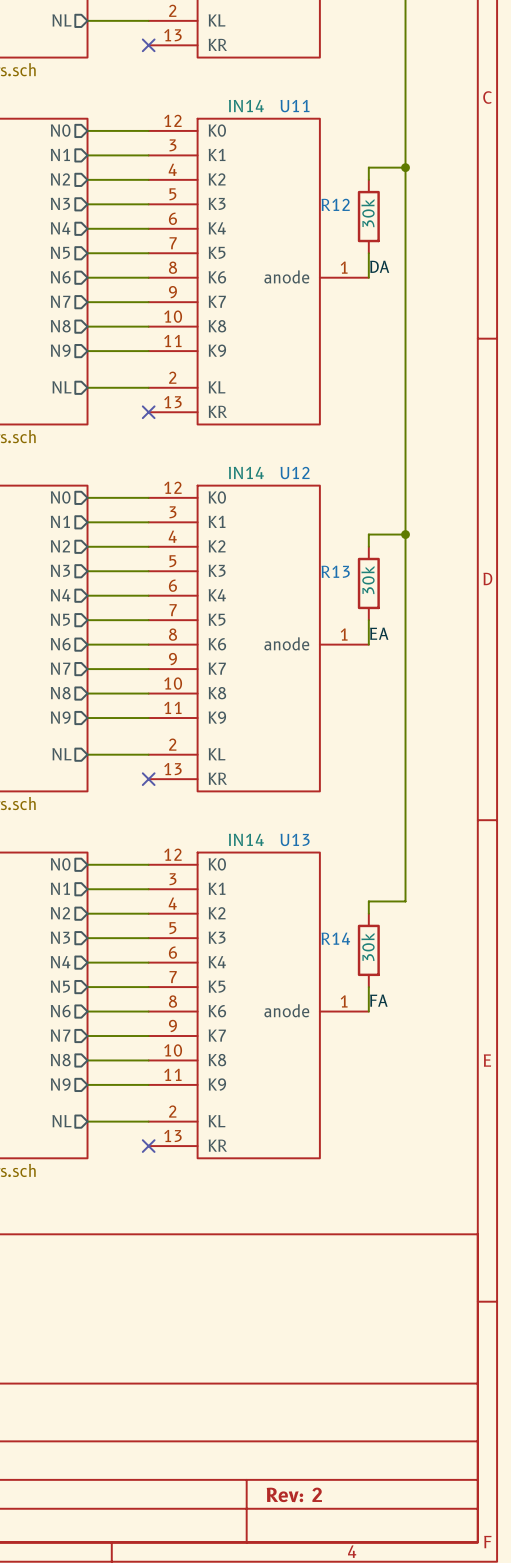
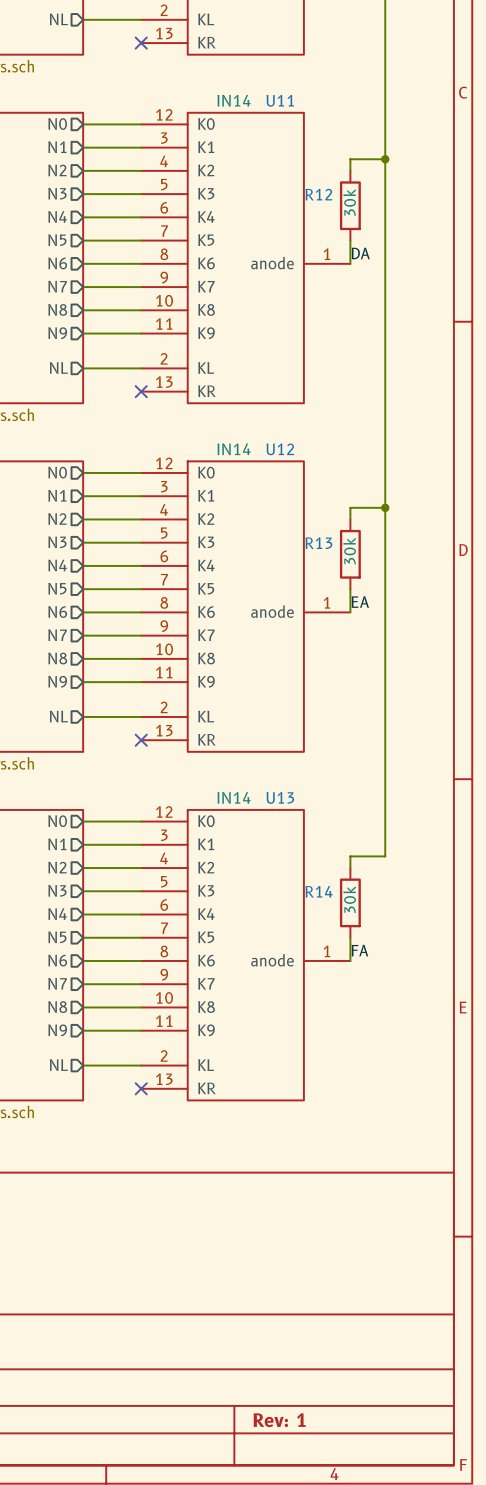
title block: Rev: 2 (294, 1494) -> Rev: 1 (279, 1420)

